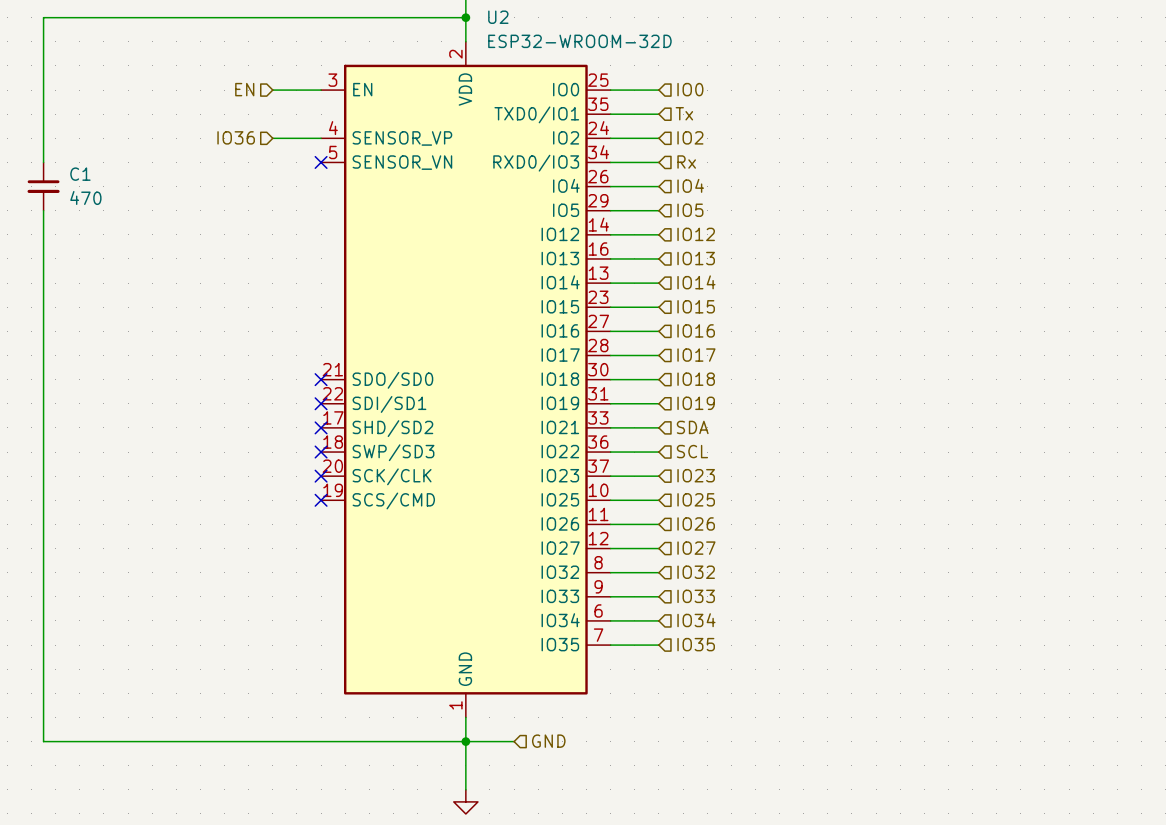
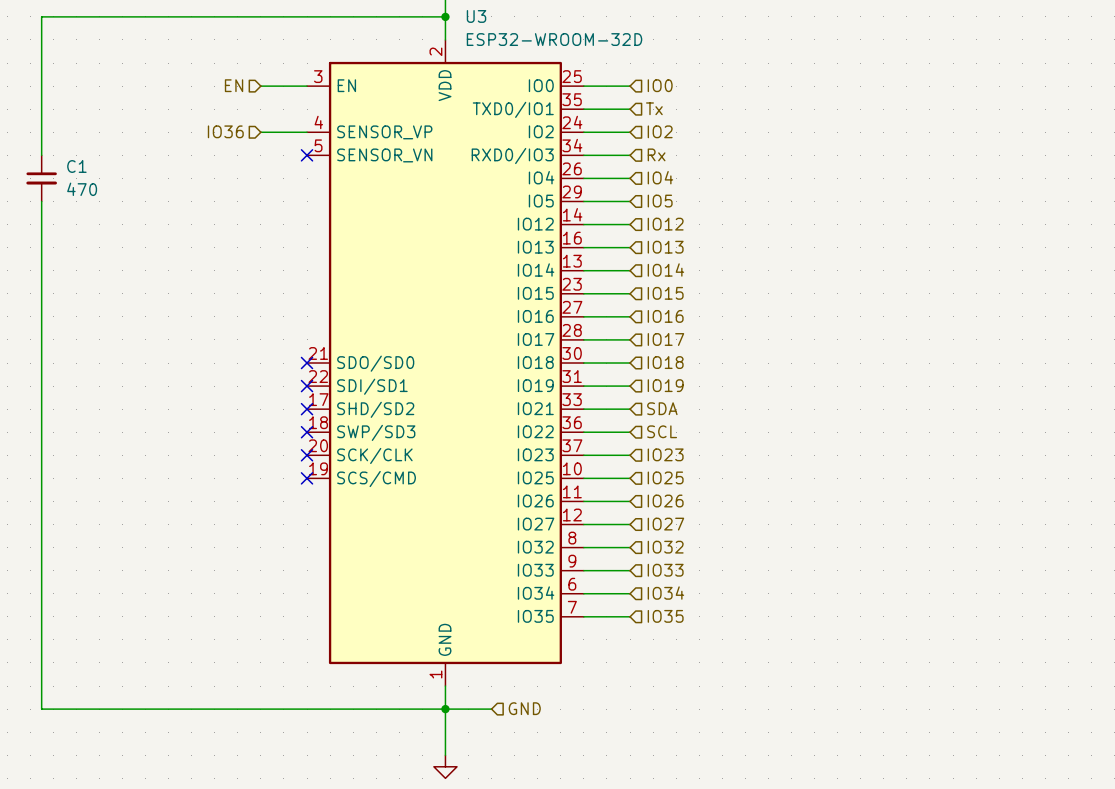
U2 name: U2 (498, 17) -> U3 (476, 16)

